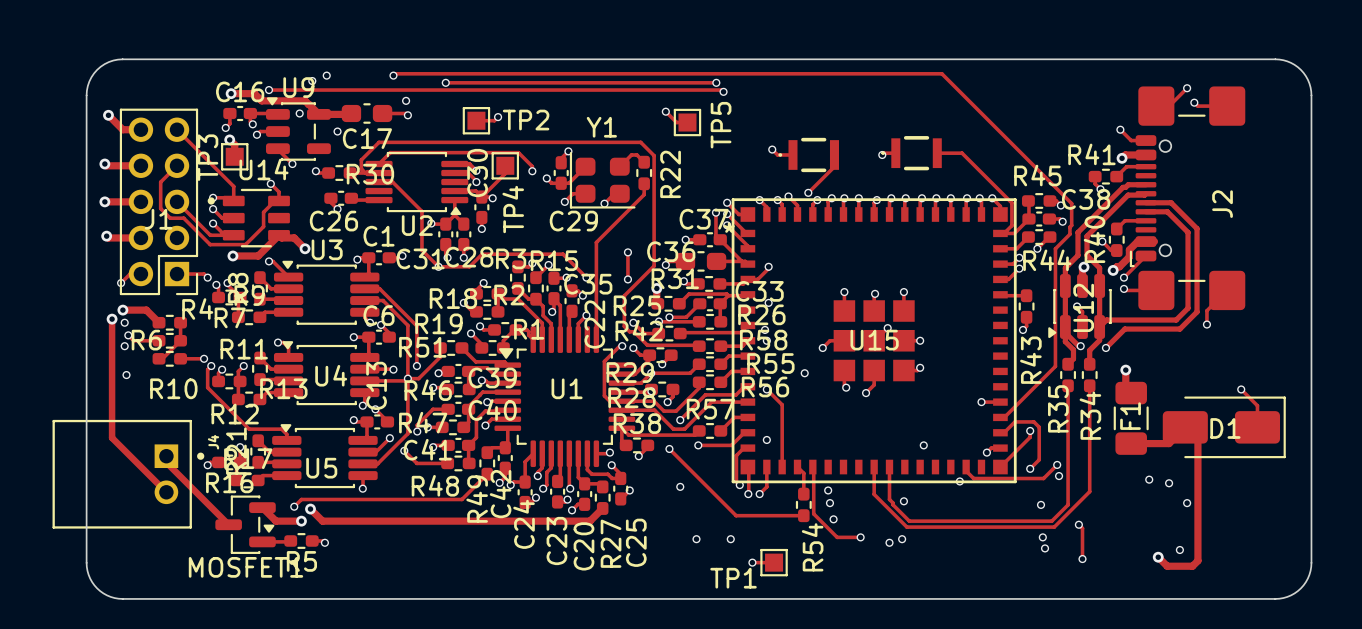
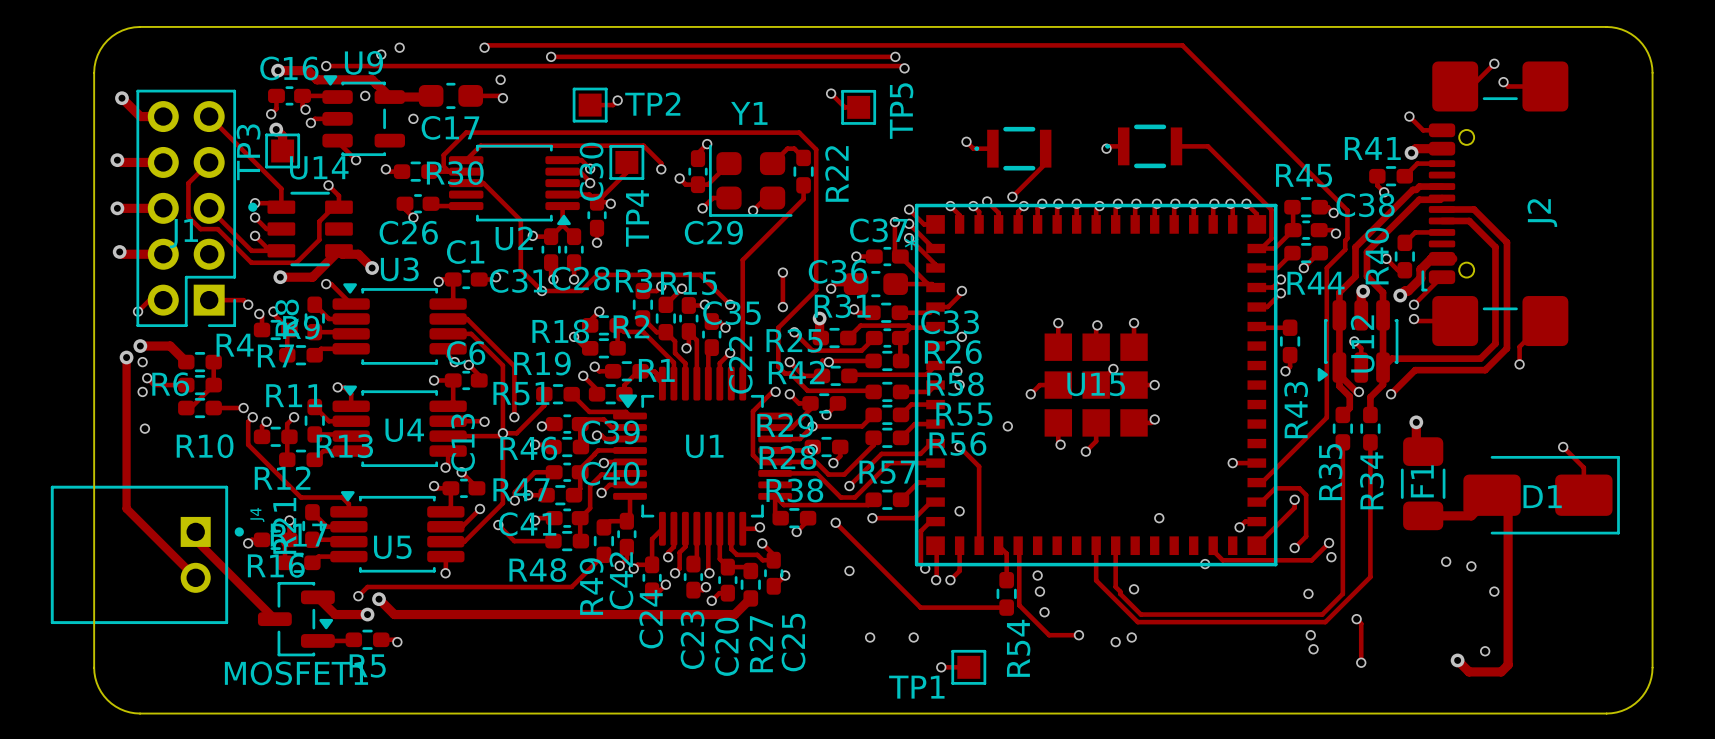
via: none -> (794, 332)
track: (689, 313) (686, 317) (669, 317) -> (861, 350) (812, 350) (794, 332)
via: (669, 317) -> none
via: (658, 321) -> none
via: none -> (828, 362)

